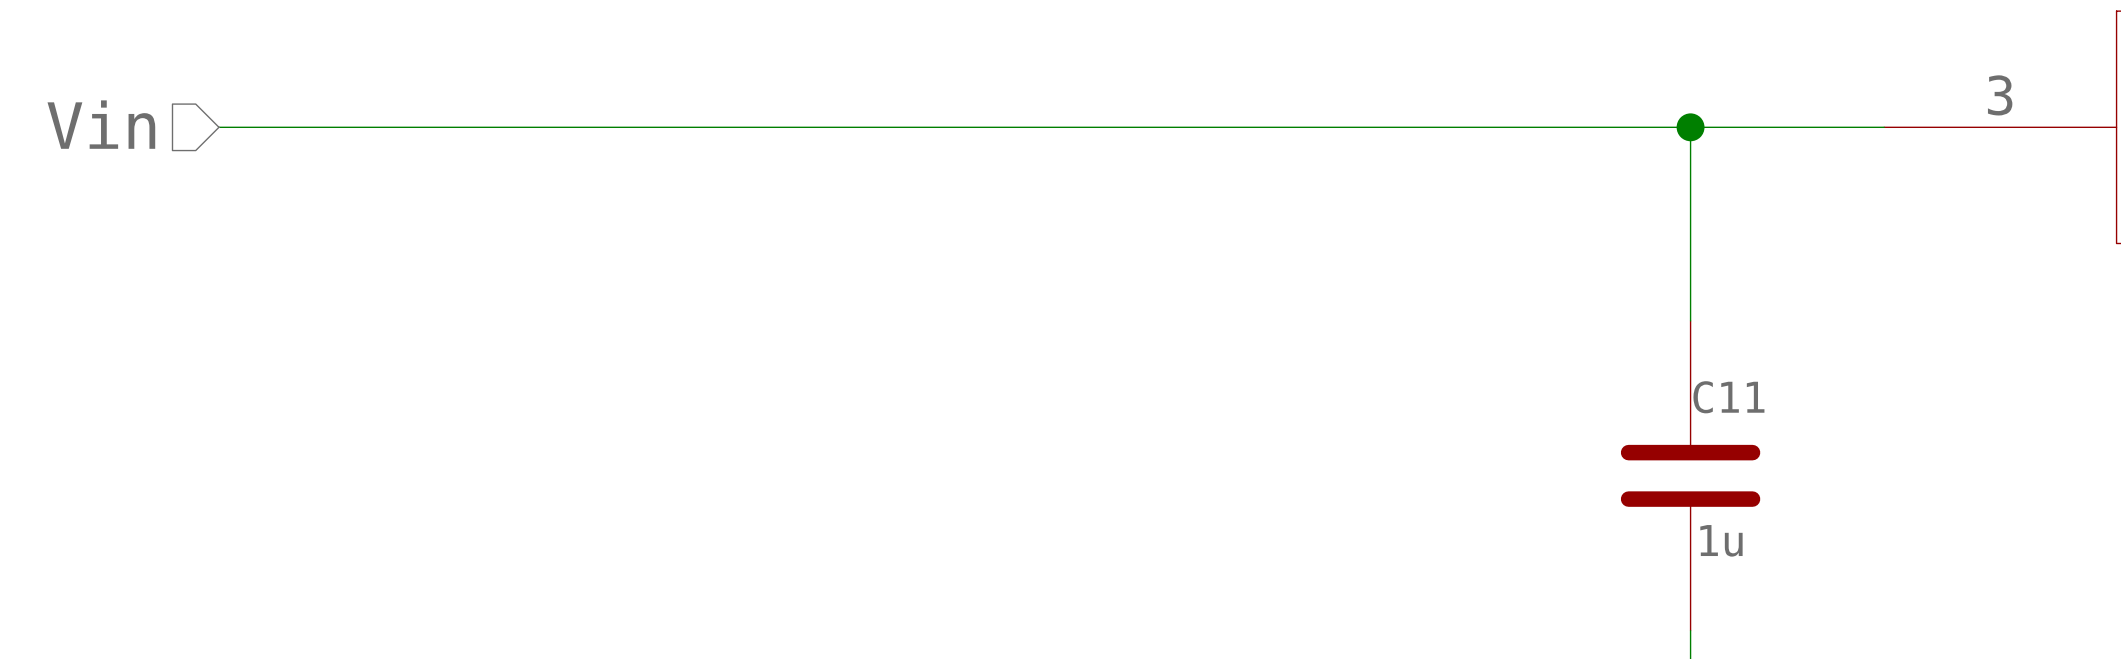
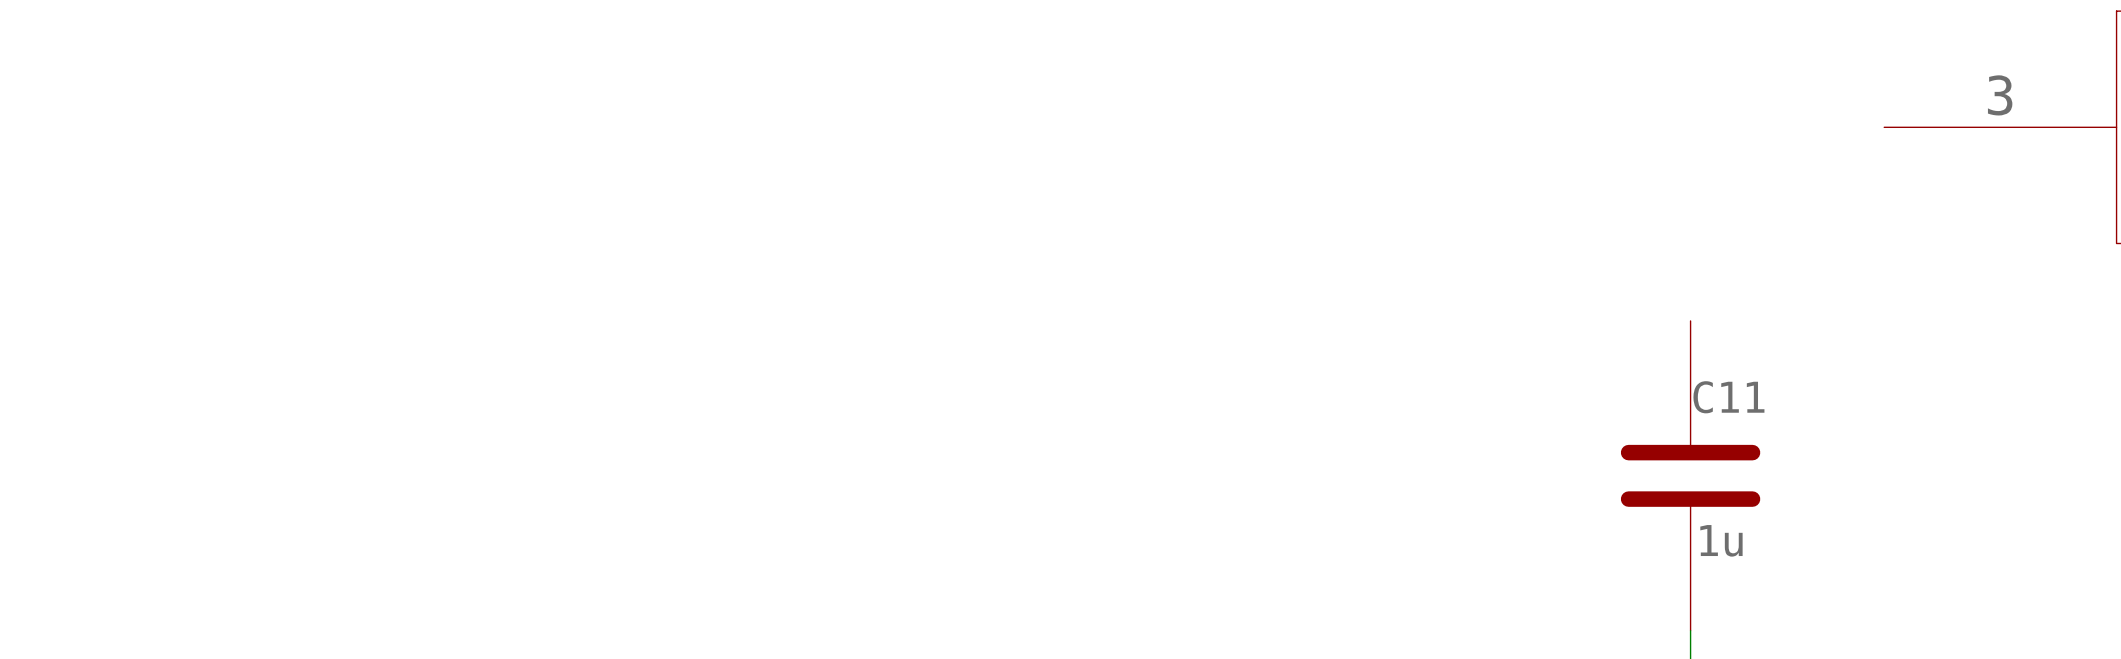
hierarchical label: Vin (101, 124) -> none
wire: (218, 127) (1884, 127) -> none
wire: (1690, 127) (1690, 320) -> none
junction: (1690, 127) -> none

